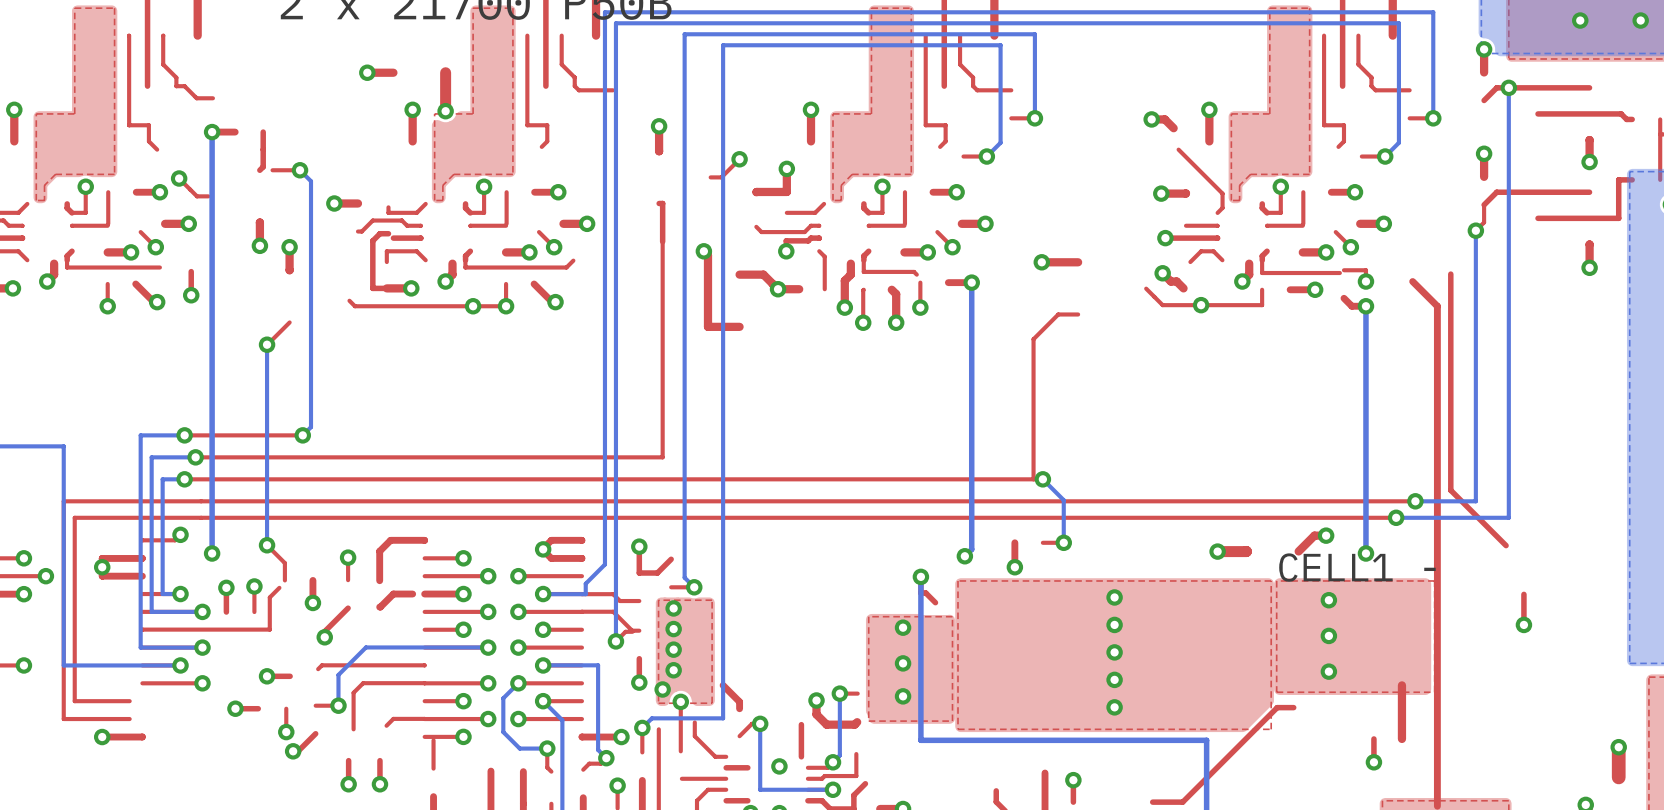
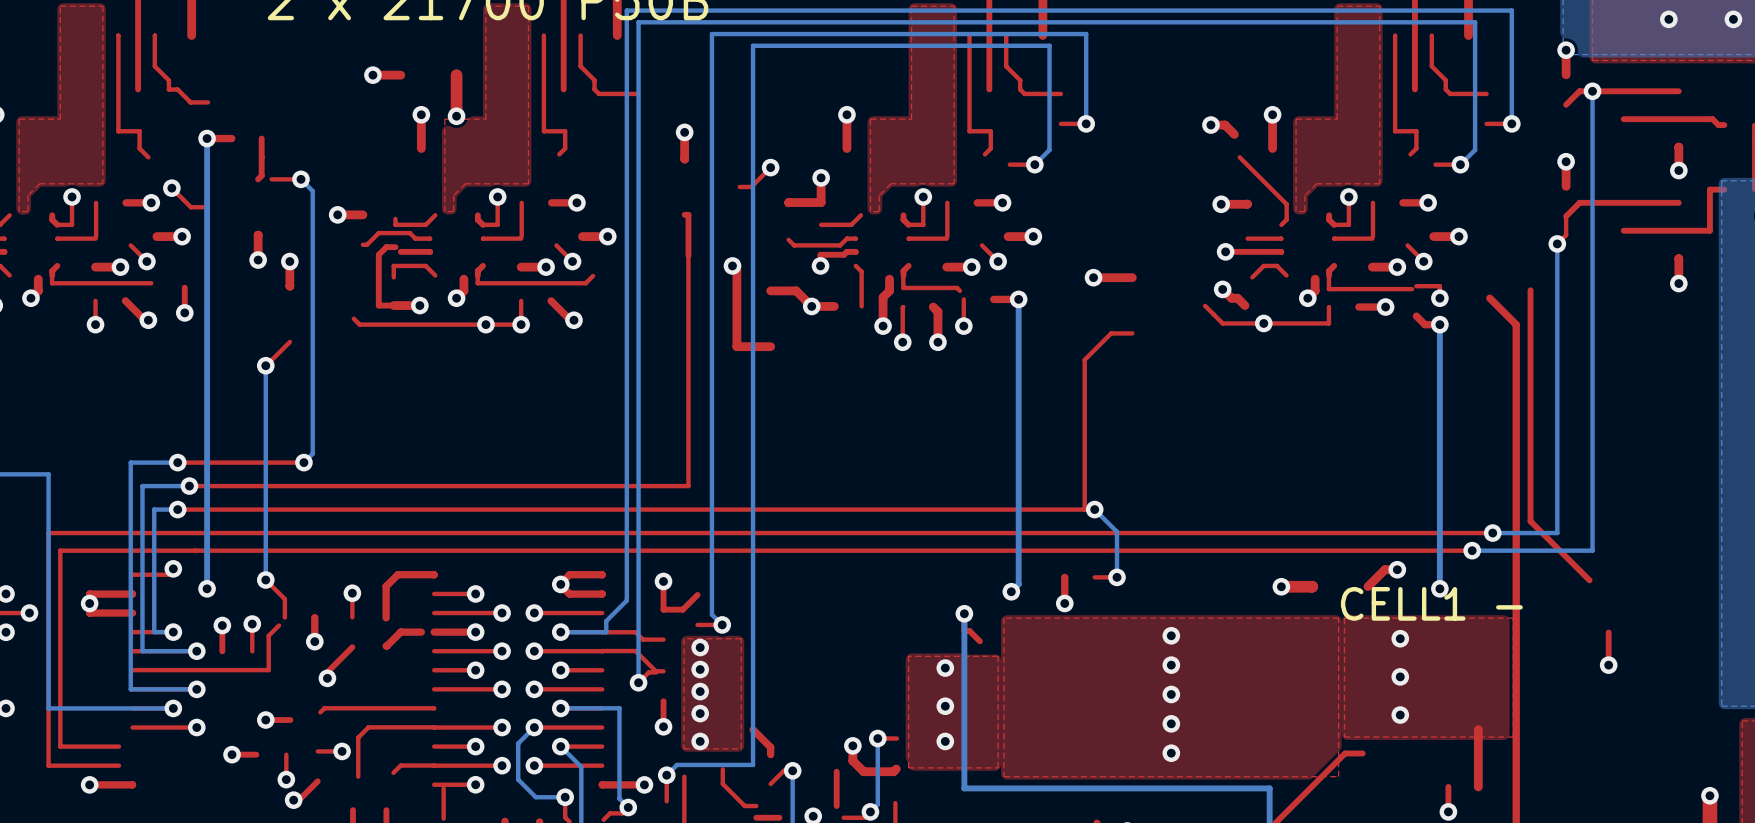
bottom track: (488, 647) (365, 647) (338, 674) (338, 705) -> none
via: (662, 689) -> none
via: none -> (700, 741)
top track: (680, 701) (680, 751) -> none
via: (680, 701) -> none

